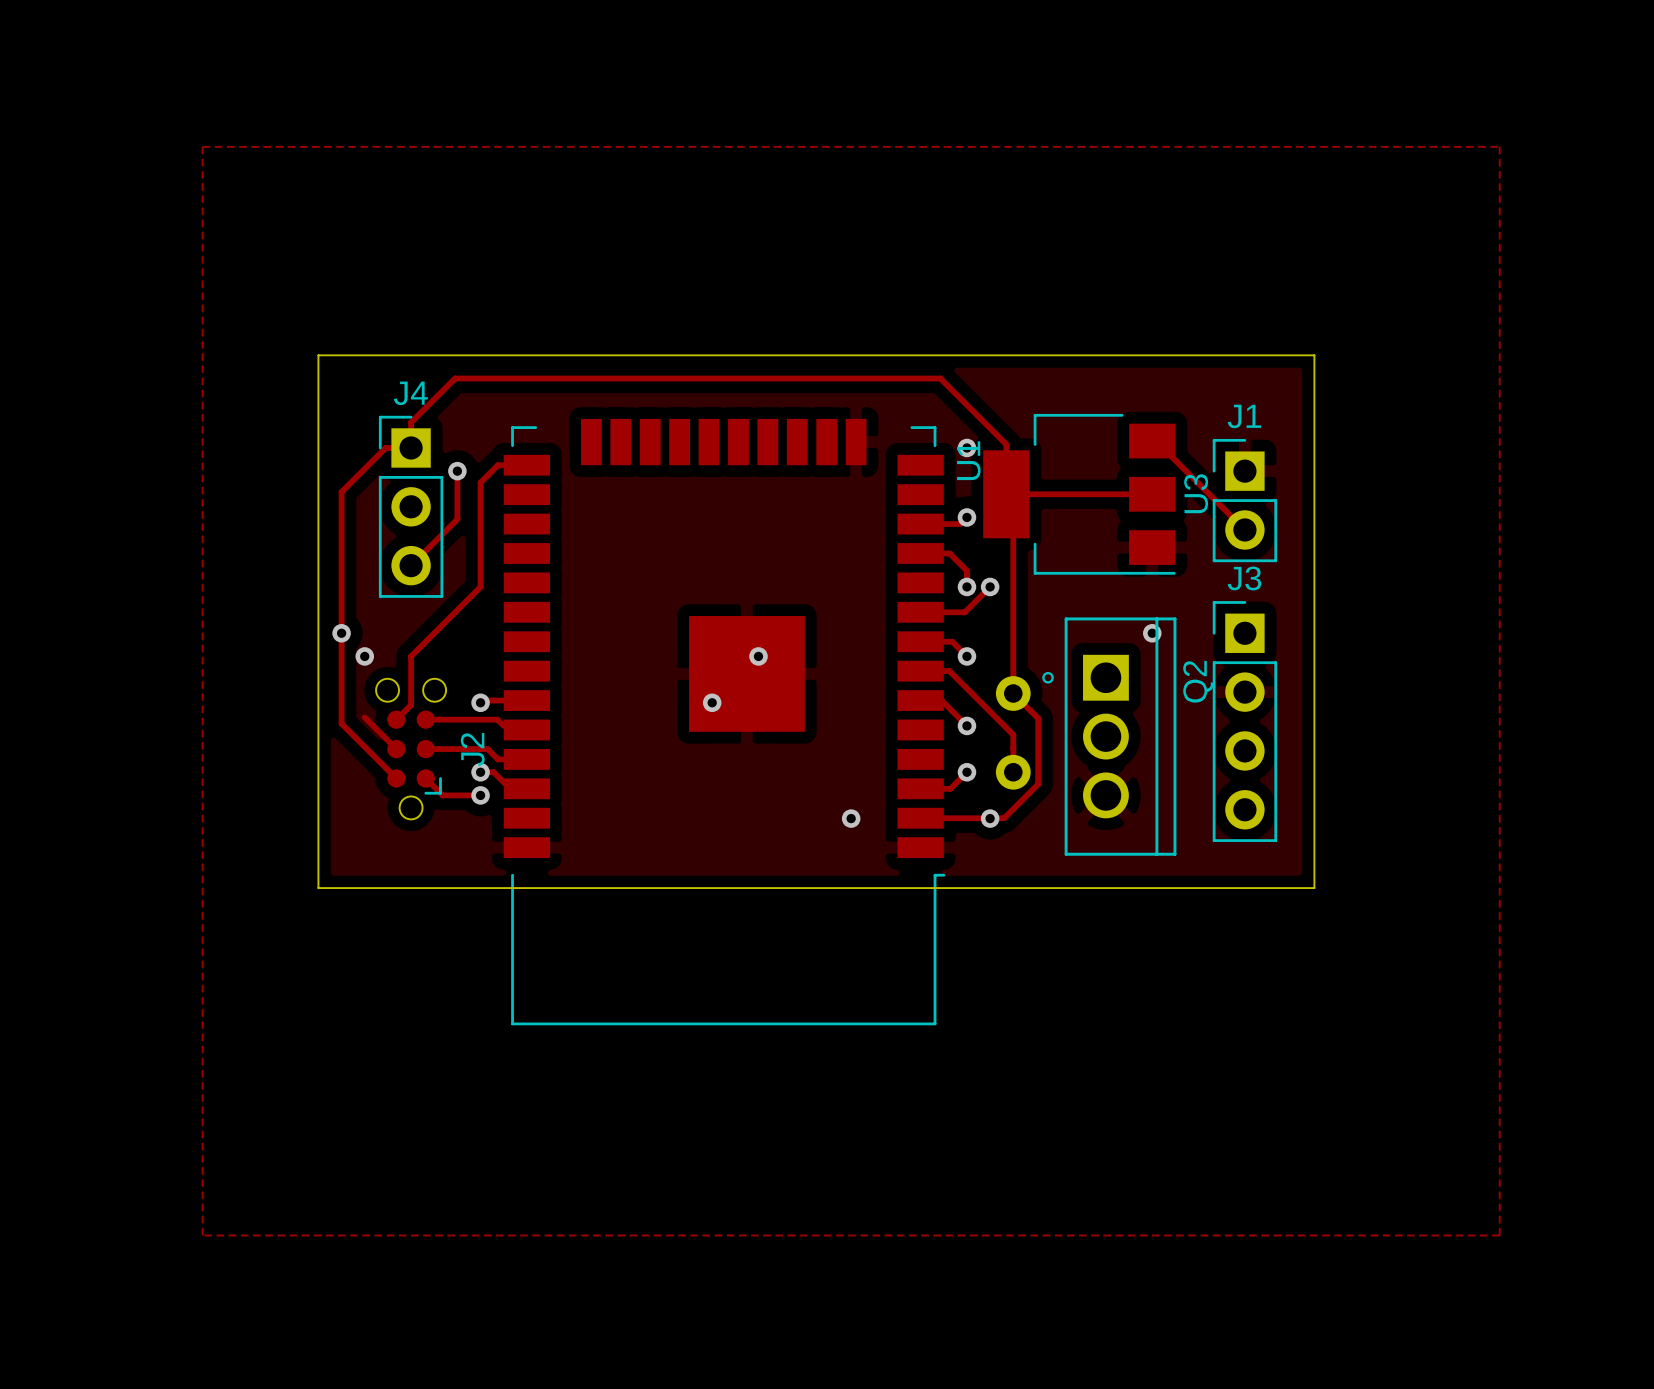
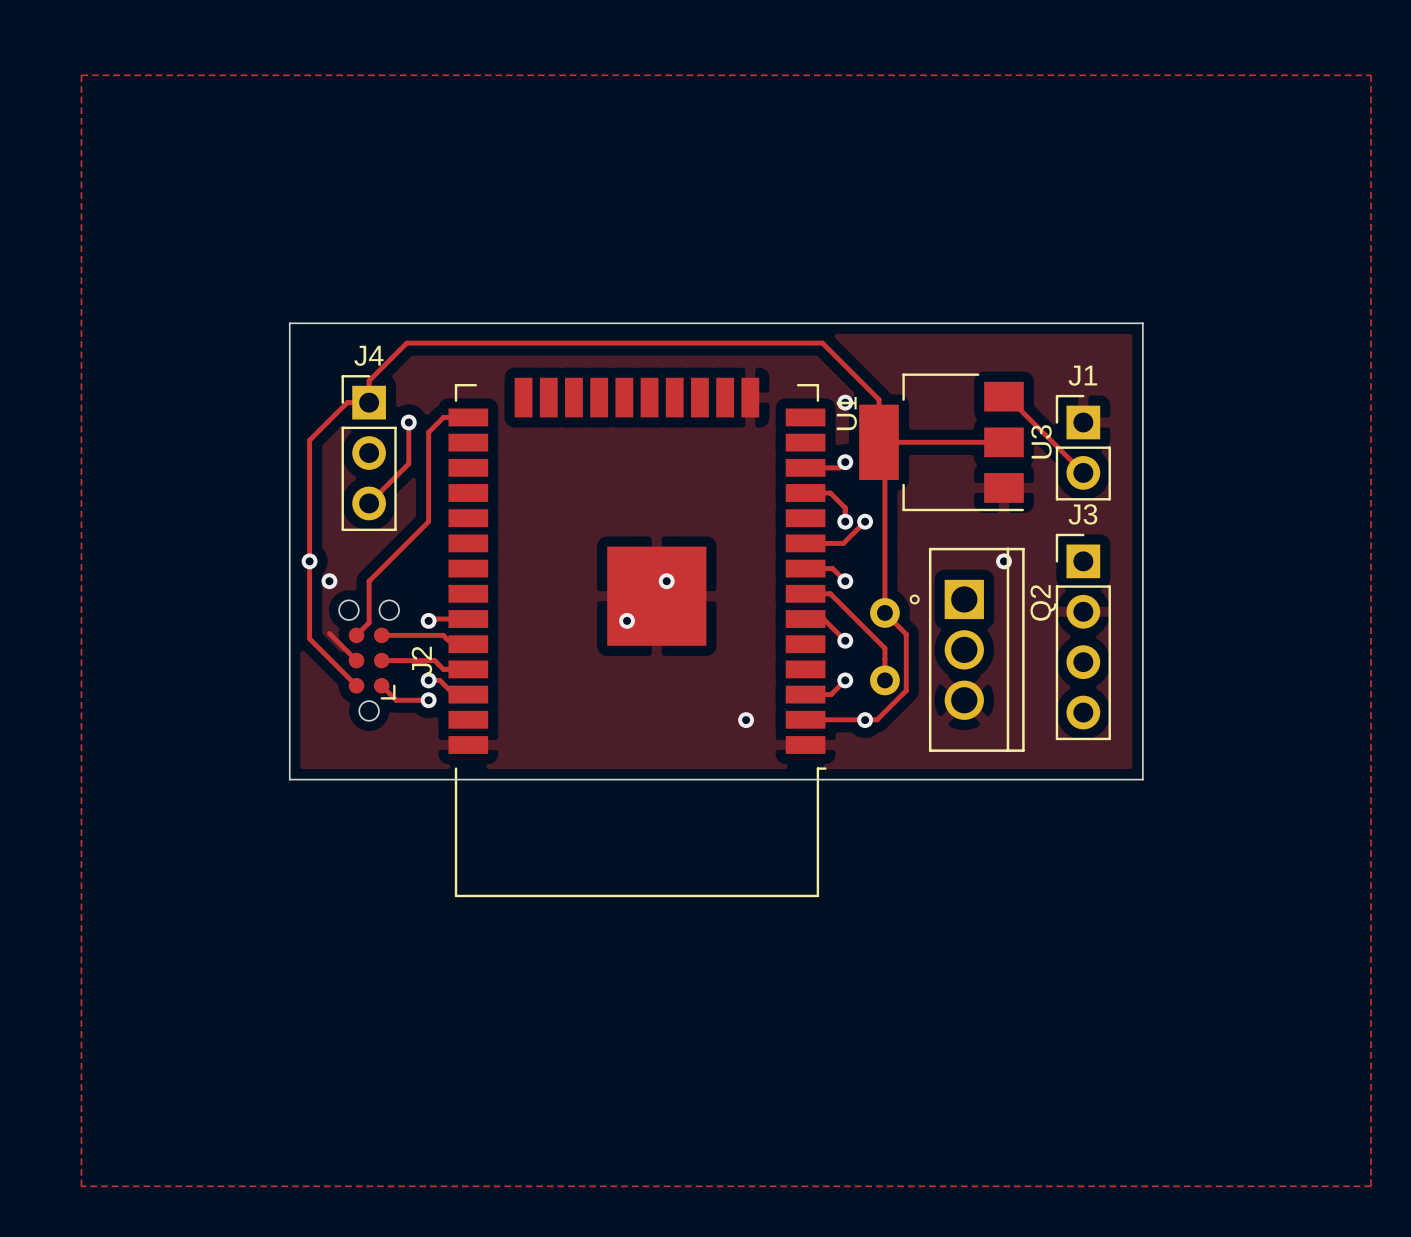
zone outline: (202, 146) (202, 1235) (1499, 1235) (1499, 146) (202, 146) -> (81, 75) (81, 1186) (1371, 1186) (1371, 75) (81, 75)

